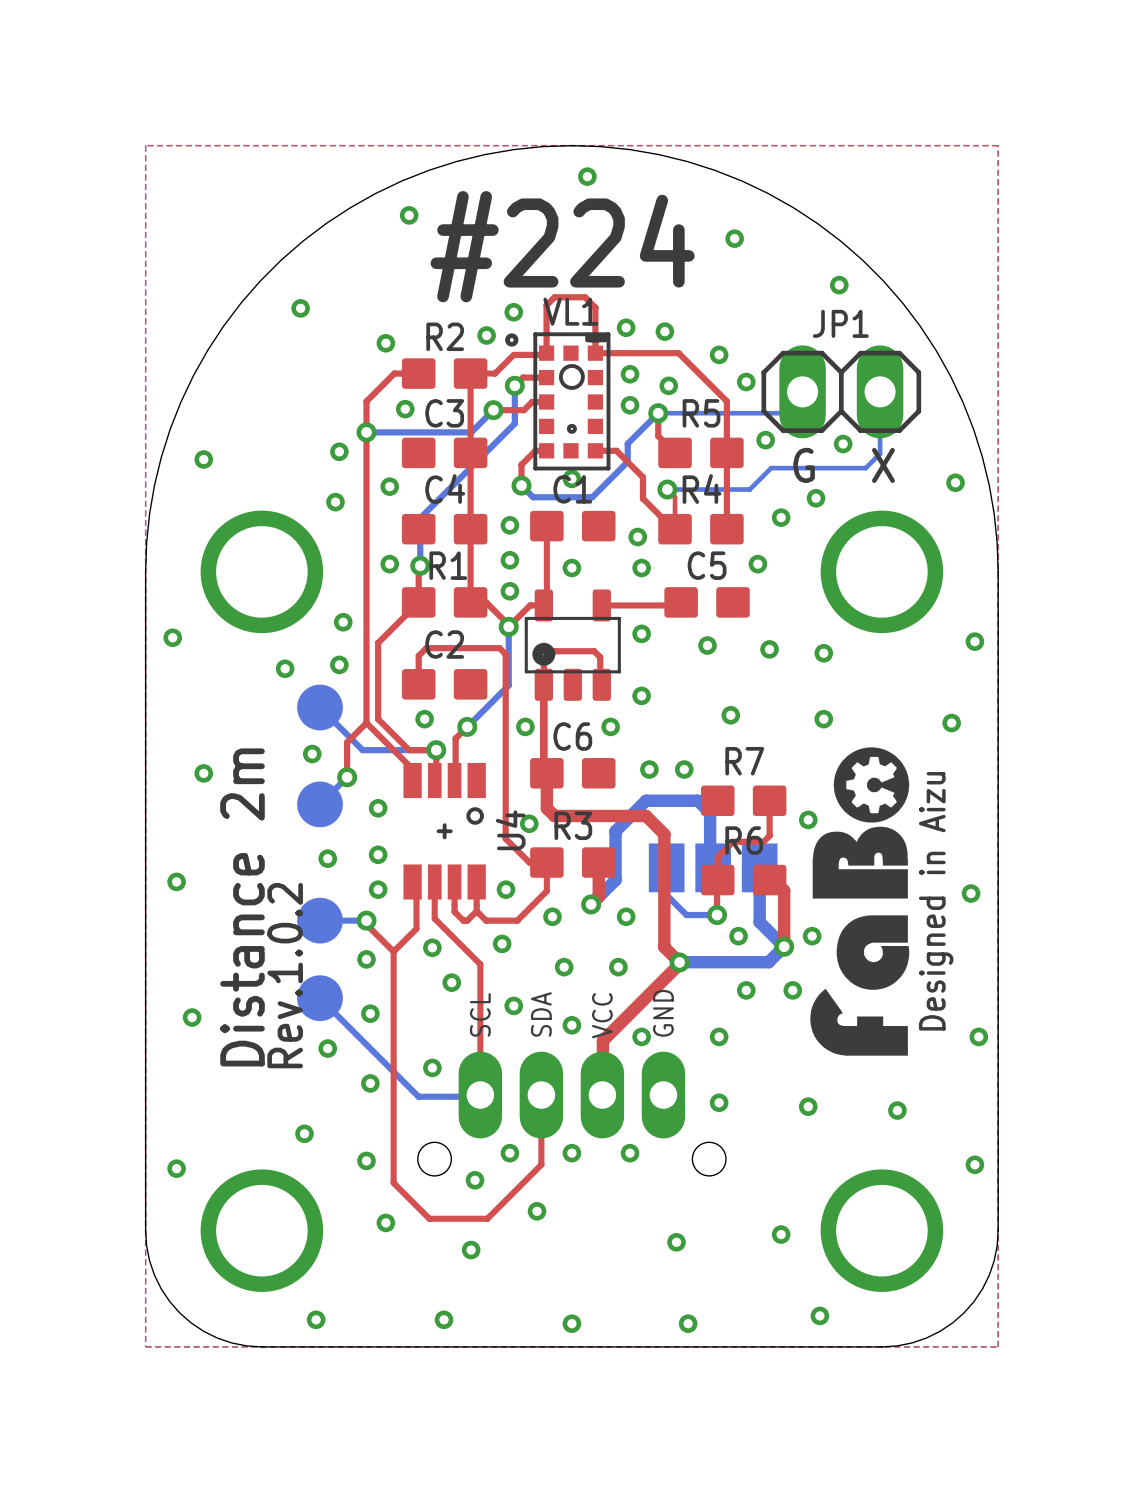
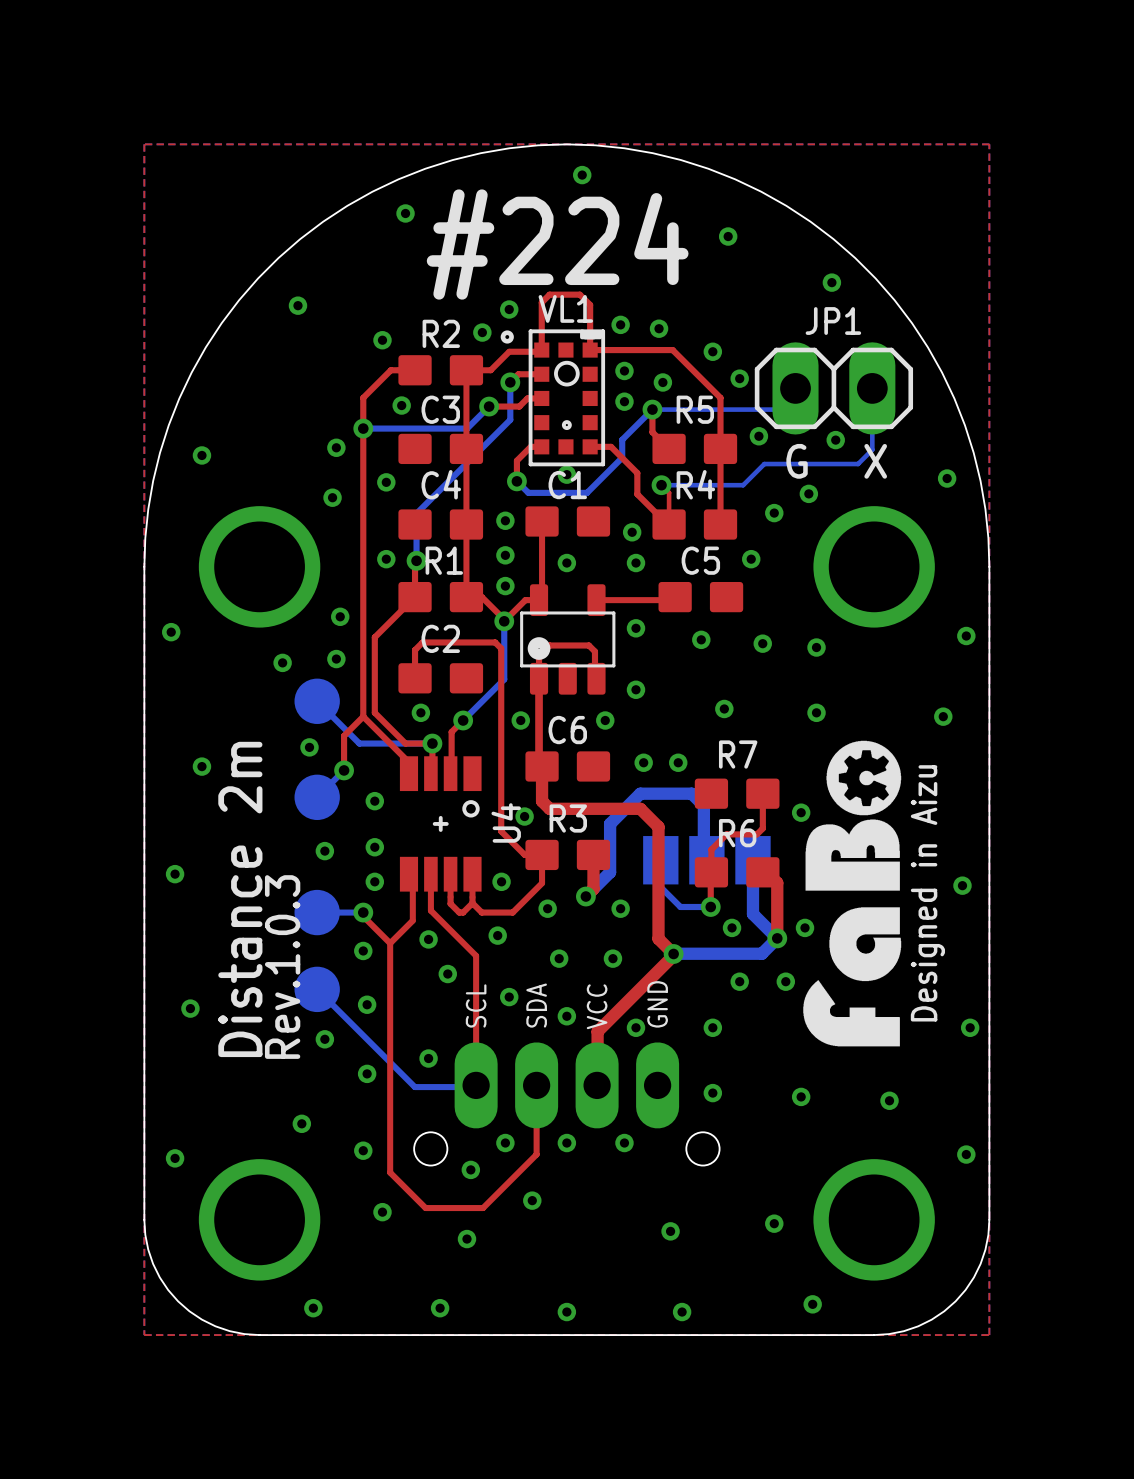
text: Rev.1.0.2 (285, 975) -> Rev.1.0.3 (282, 967)

